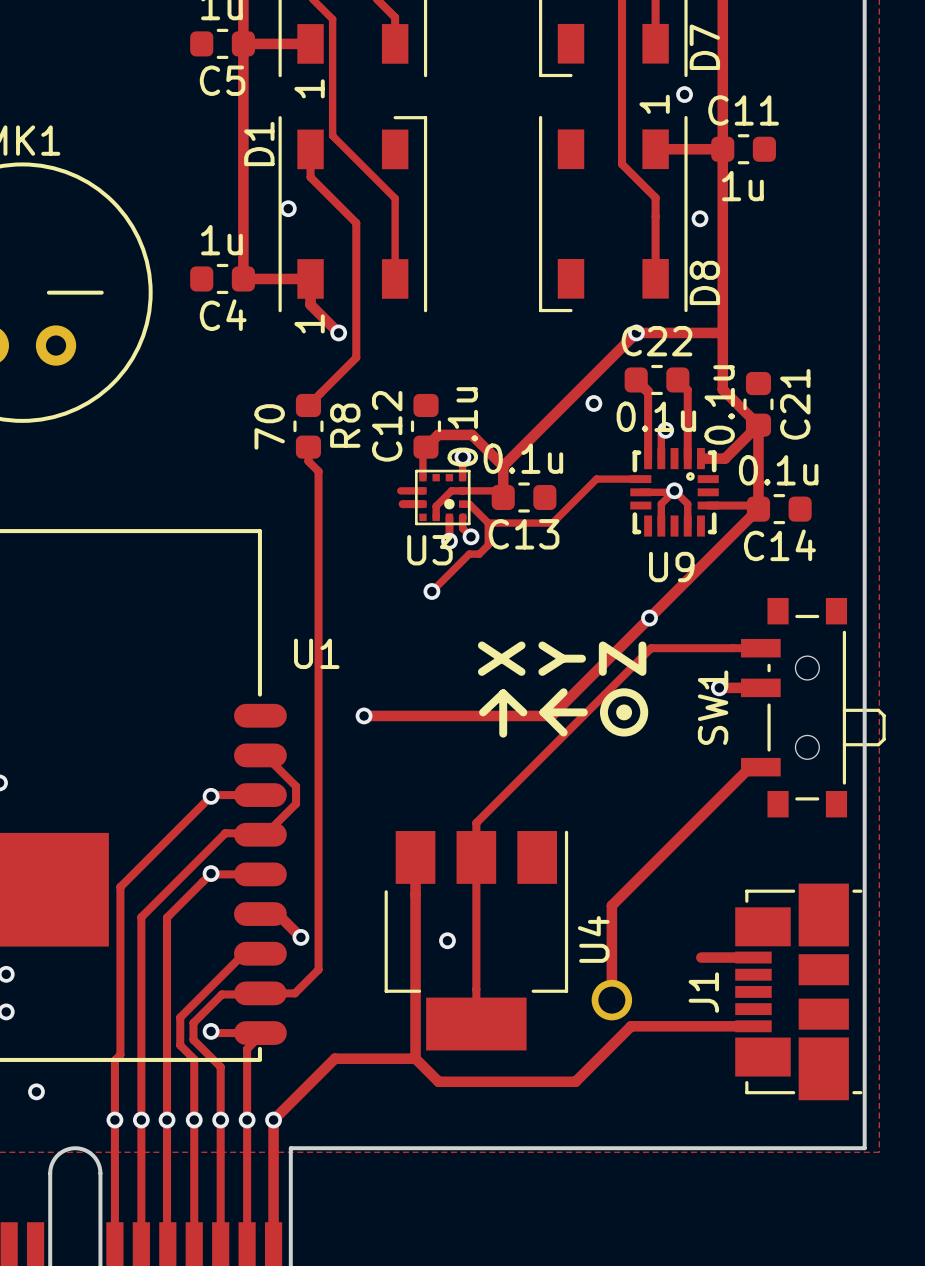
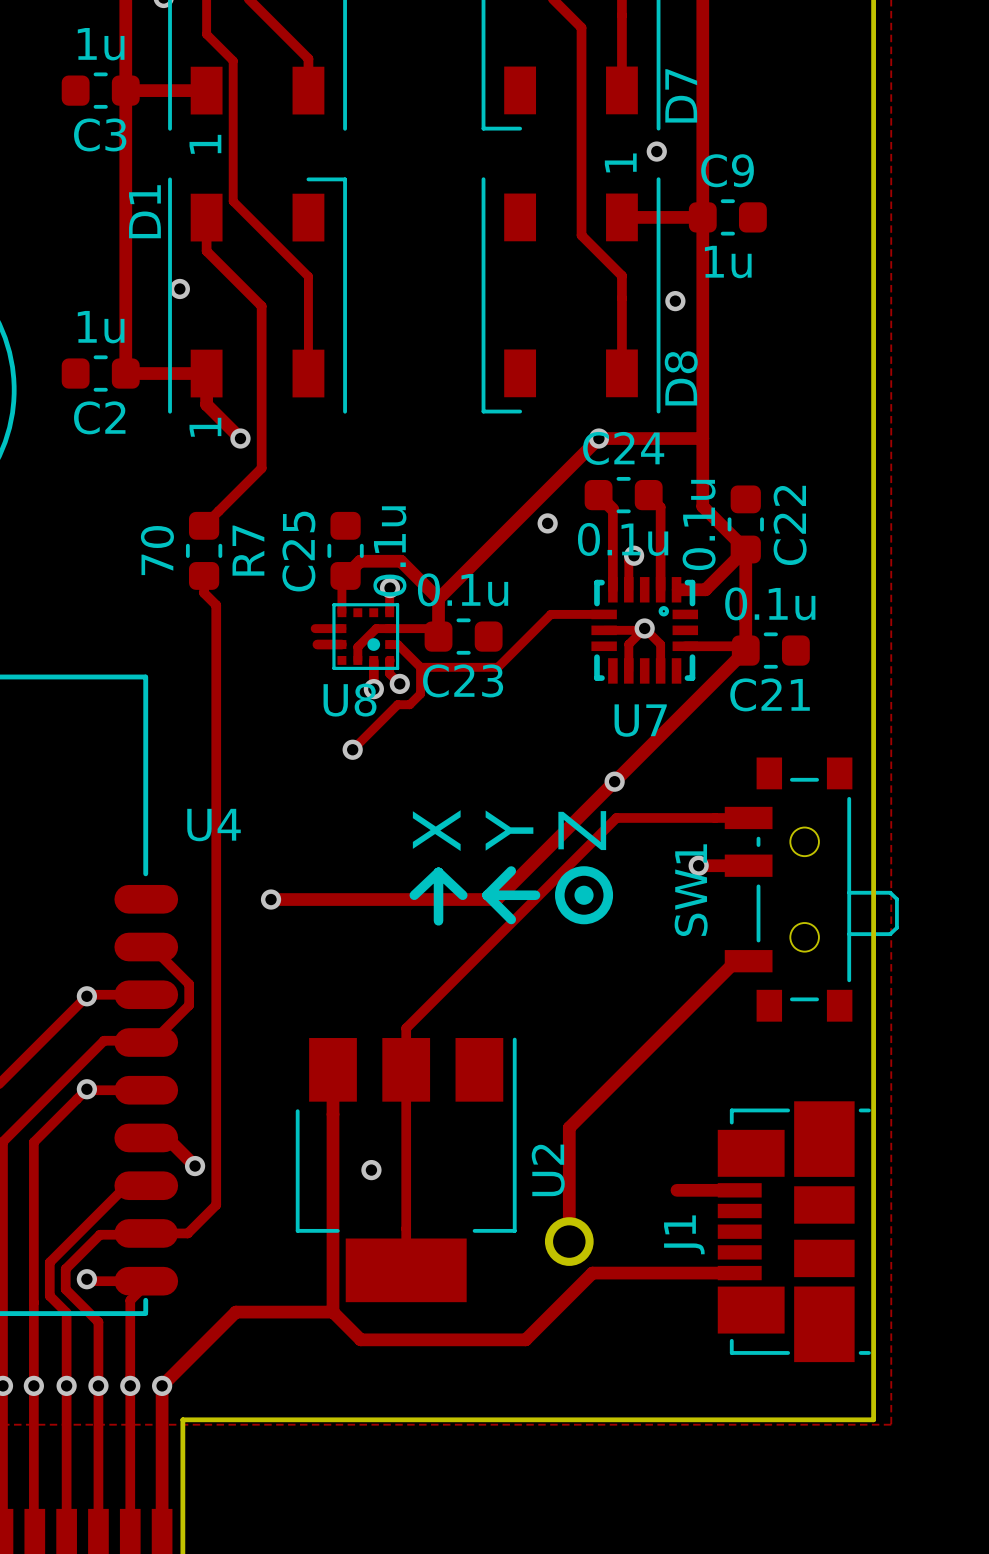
C5 name: C5 (222, 80) -> C3 (100, 134)
C11 name: C11 (743, 110) -> C9 (727, 170)
C4 name: C4 (223, 315) -> C2 (99, 417)
C22 name: C22 (657, 341) -> C24 (623, 448)
C21 name: C21 (795, 404) -> C22 (790, 525)
R8 name: R8 (345, 425) -> R7 (248, 550)
C12 name: C12 (387, 426) -> C25 (298, 551)
C13 name: C13 (524, 534) -> C23 (463, 680)
C14 name: C14 (779, 545) -> C21 (770, 694)
U3 name: U3 (429, 550) -> U8 (350, 700)
U9 name: U9 (671, 567) -> U7 (640, 720)
U1 name: U1 (316, 653) -> U4 (214, 825)
U4 name: U4 (593, 939) -> U2 (548, 1170)

